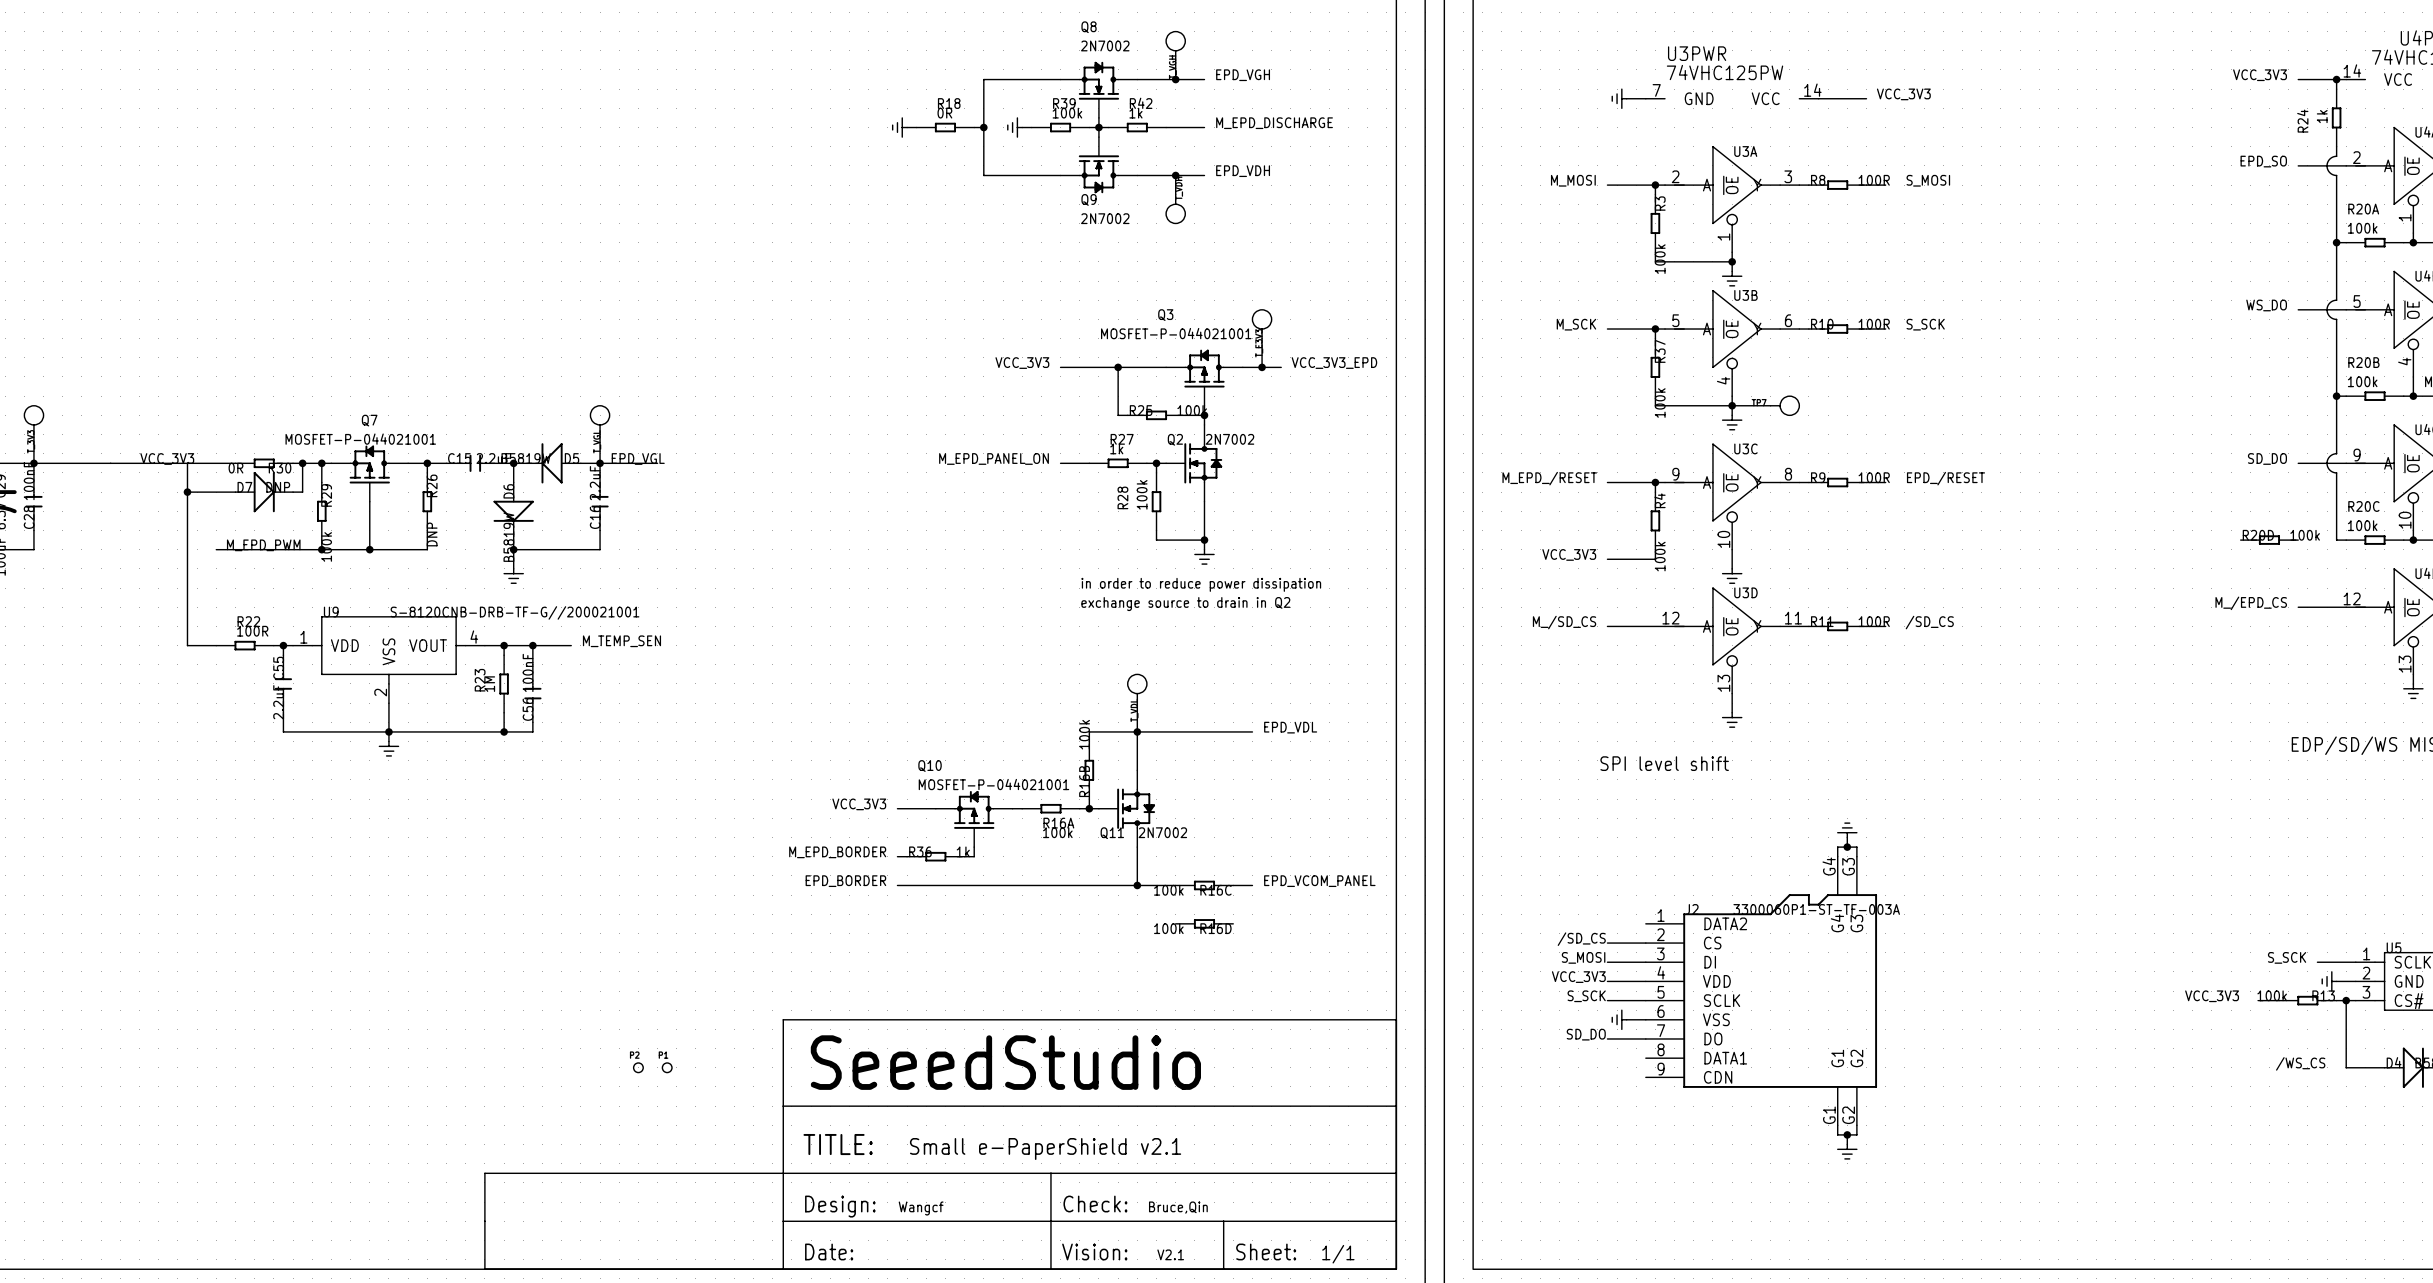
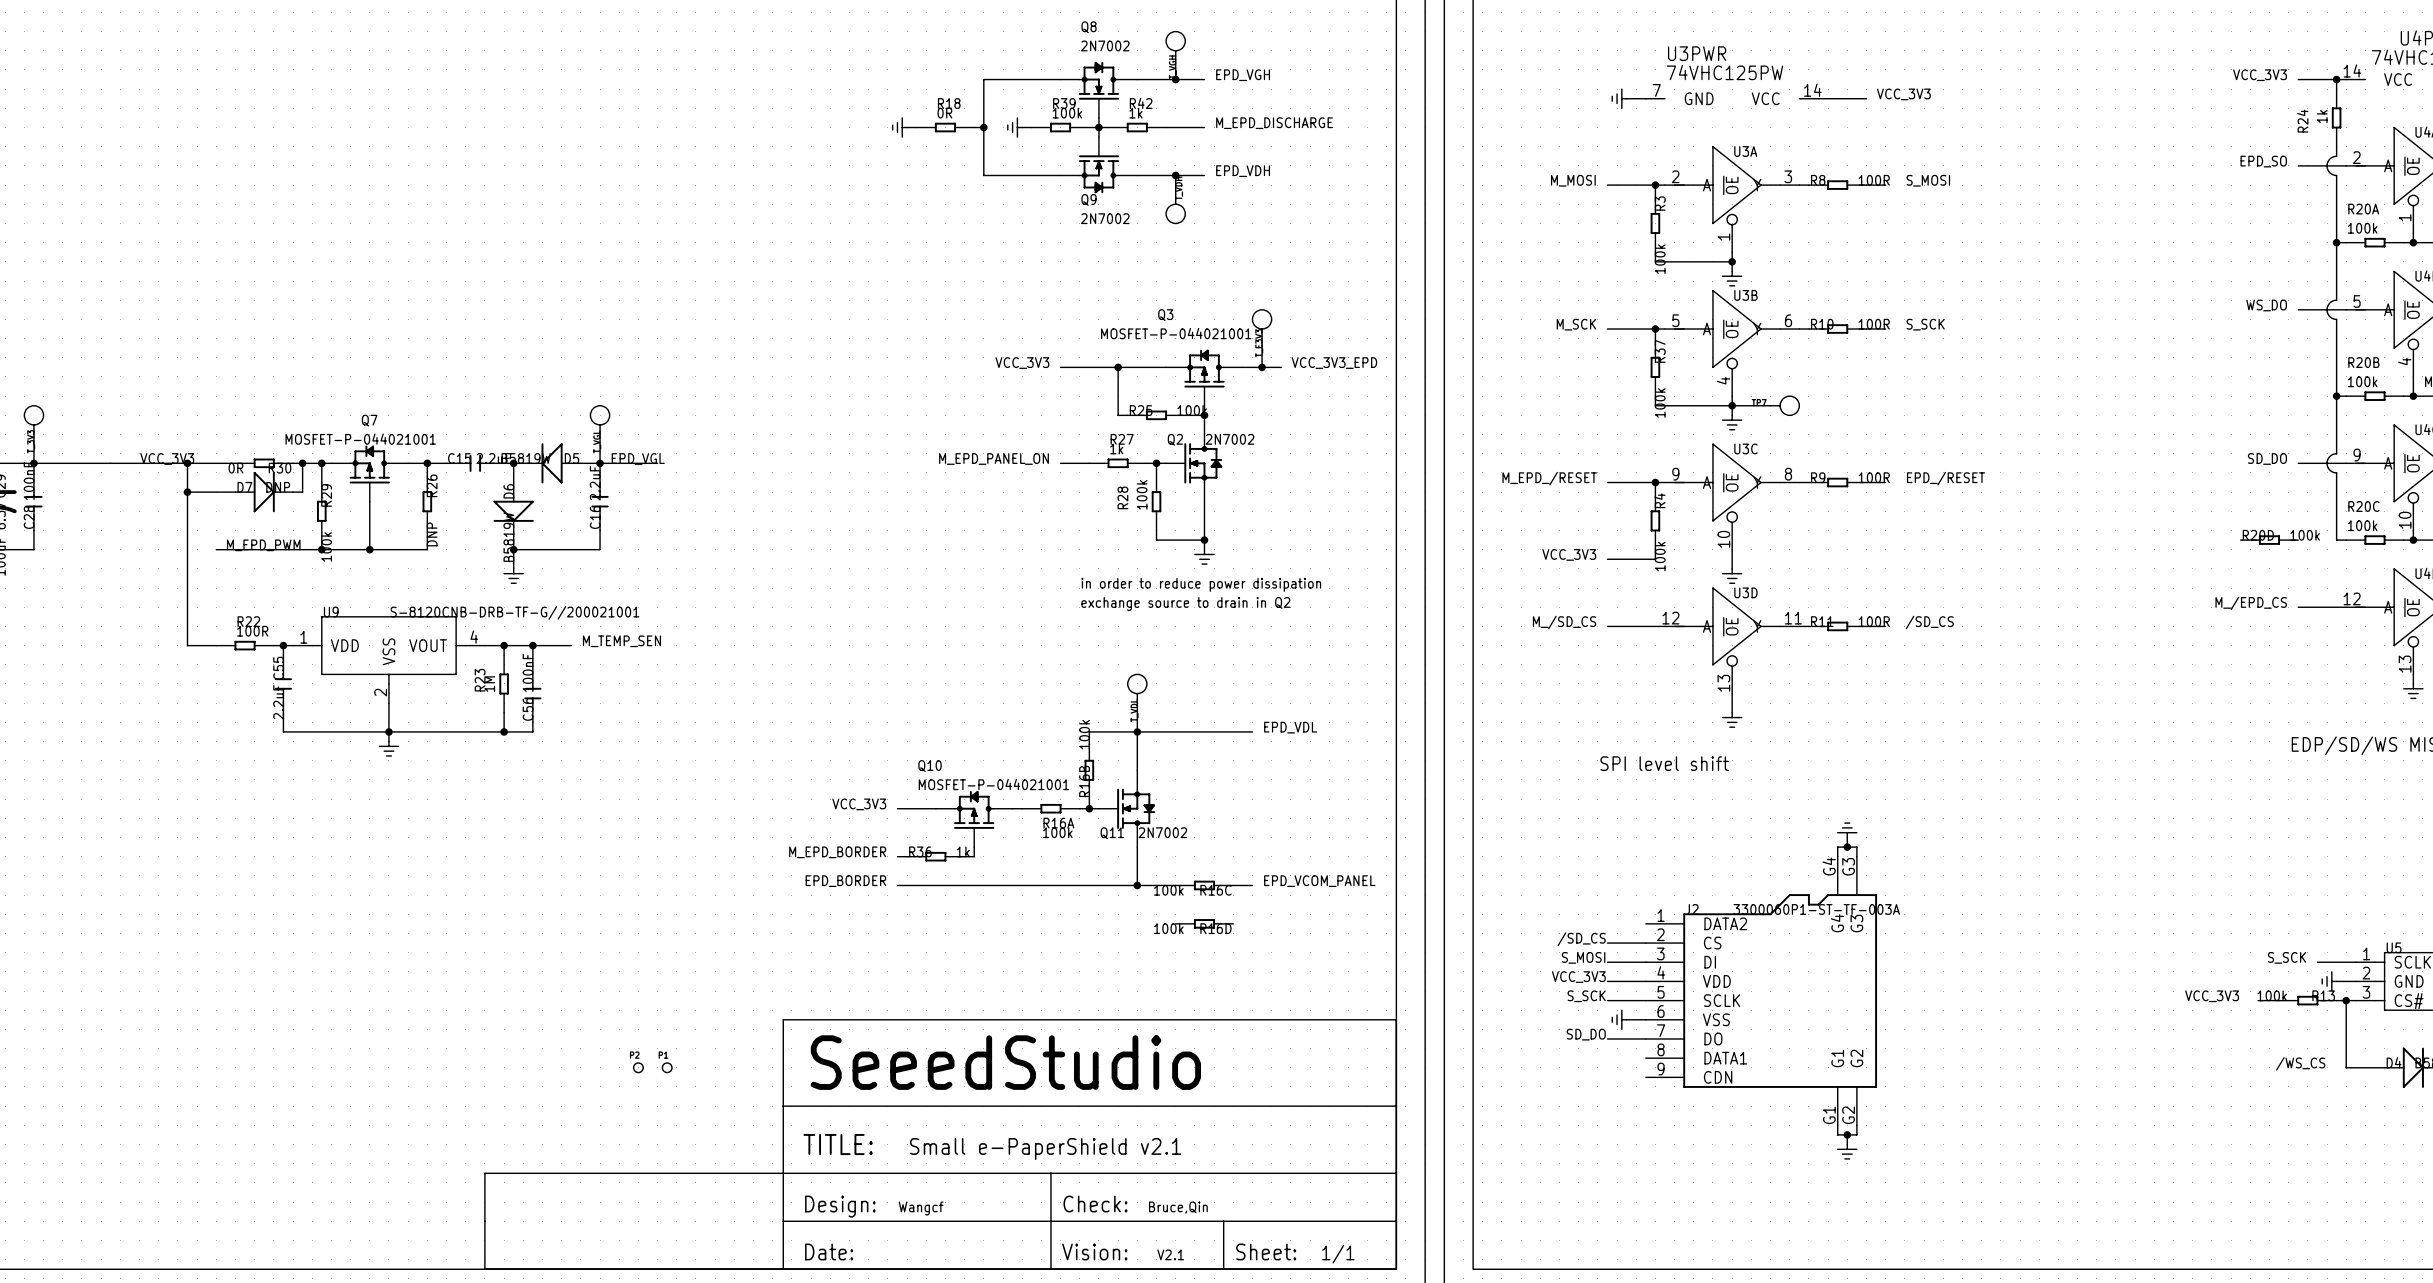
junction: none -> (187, 463)

